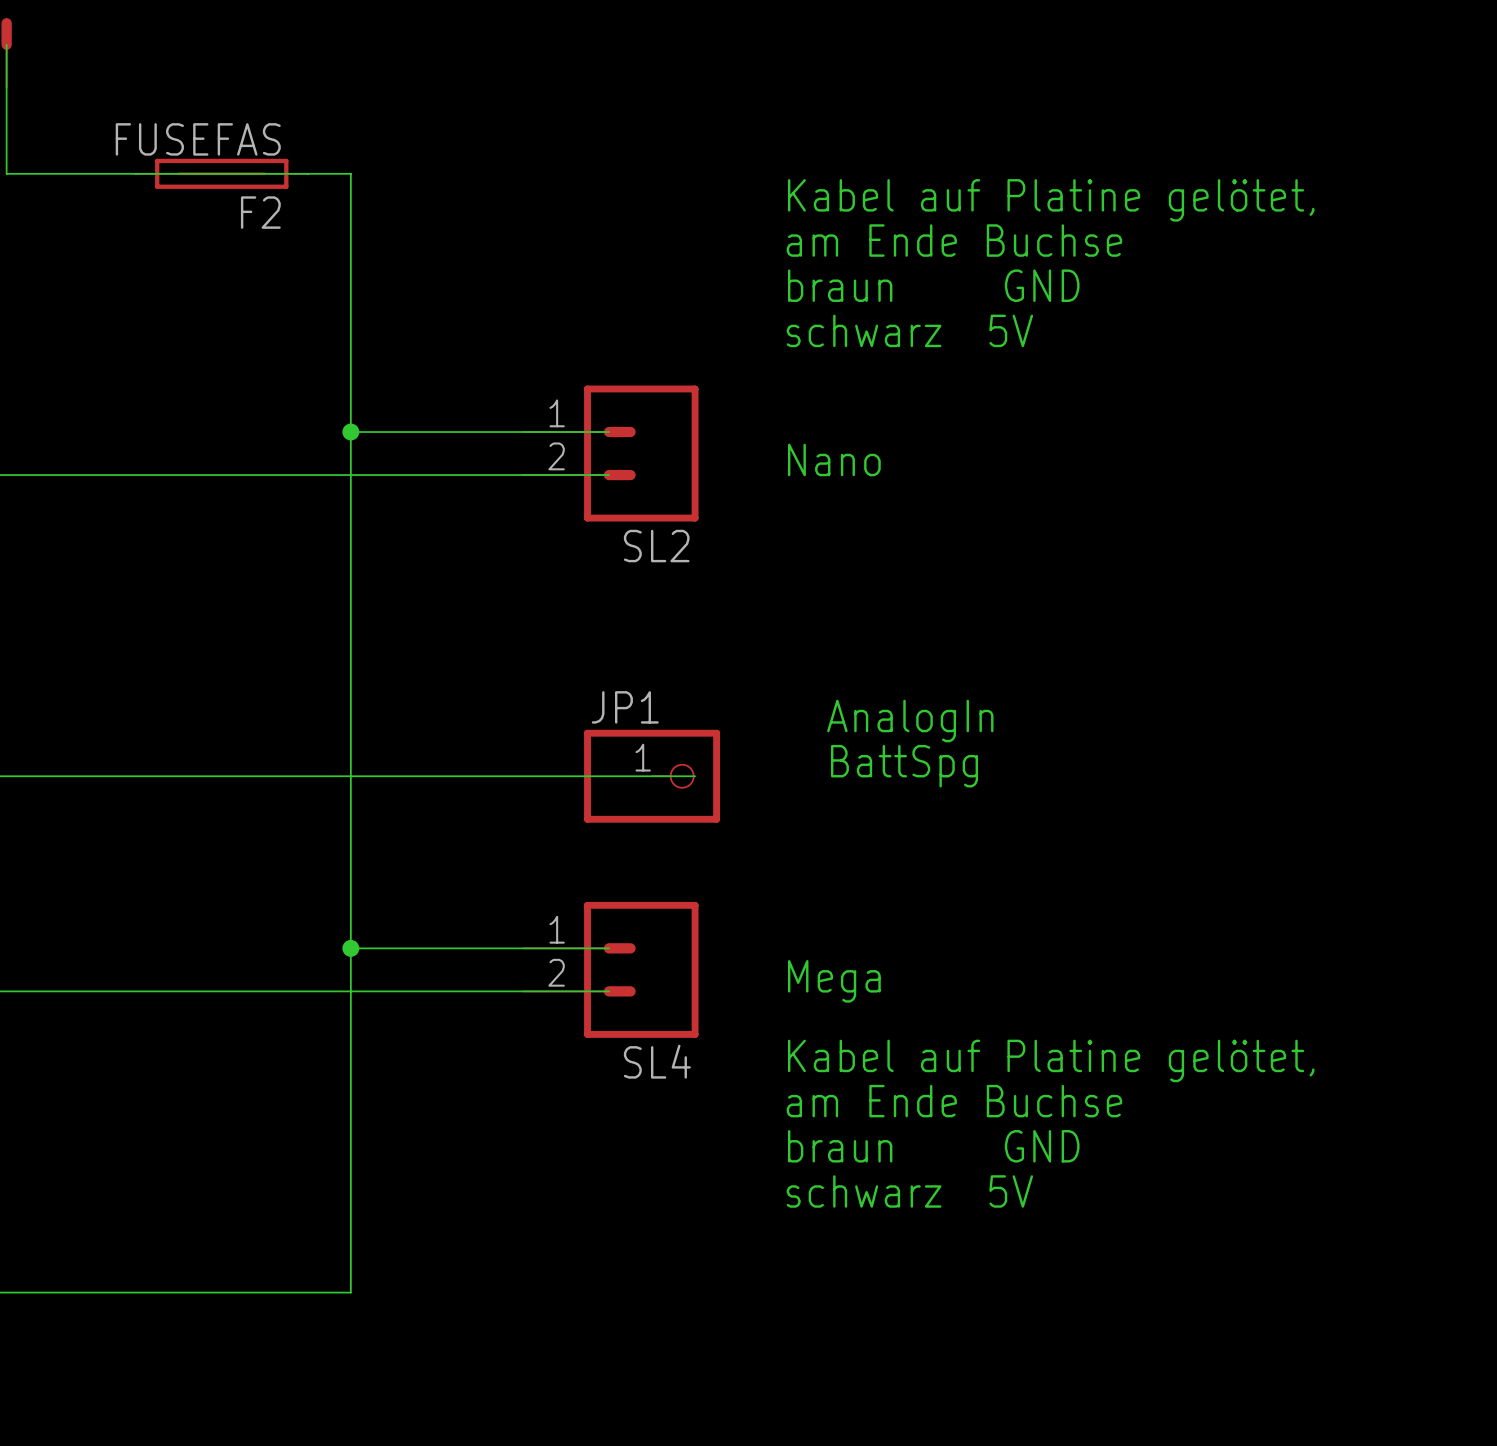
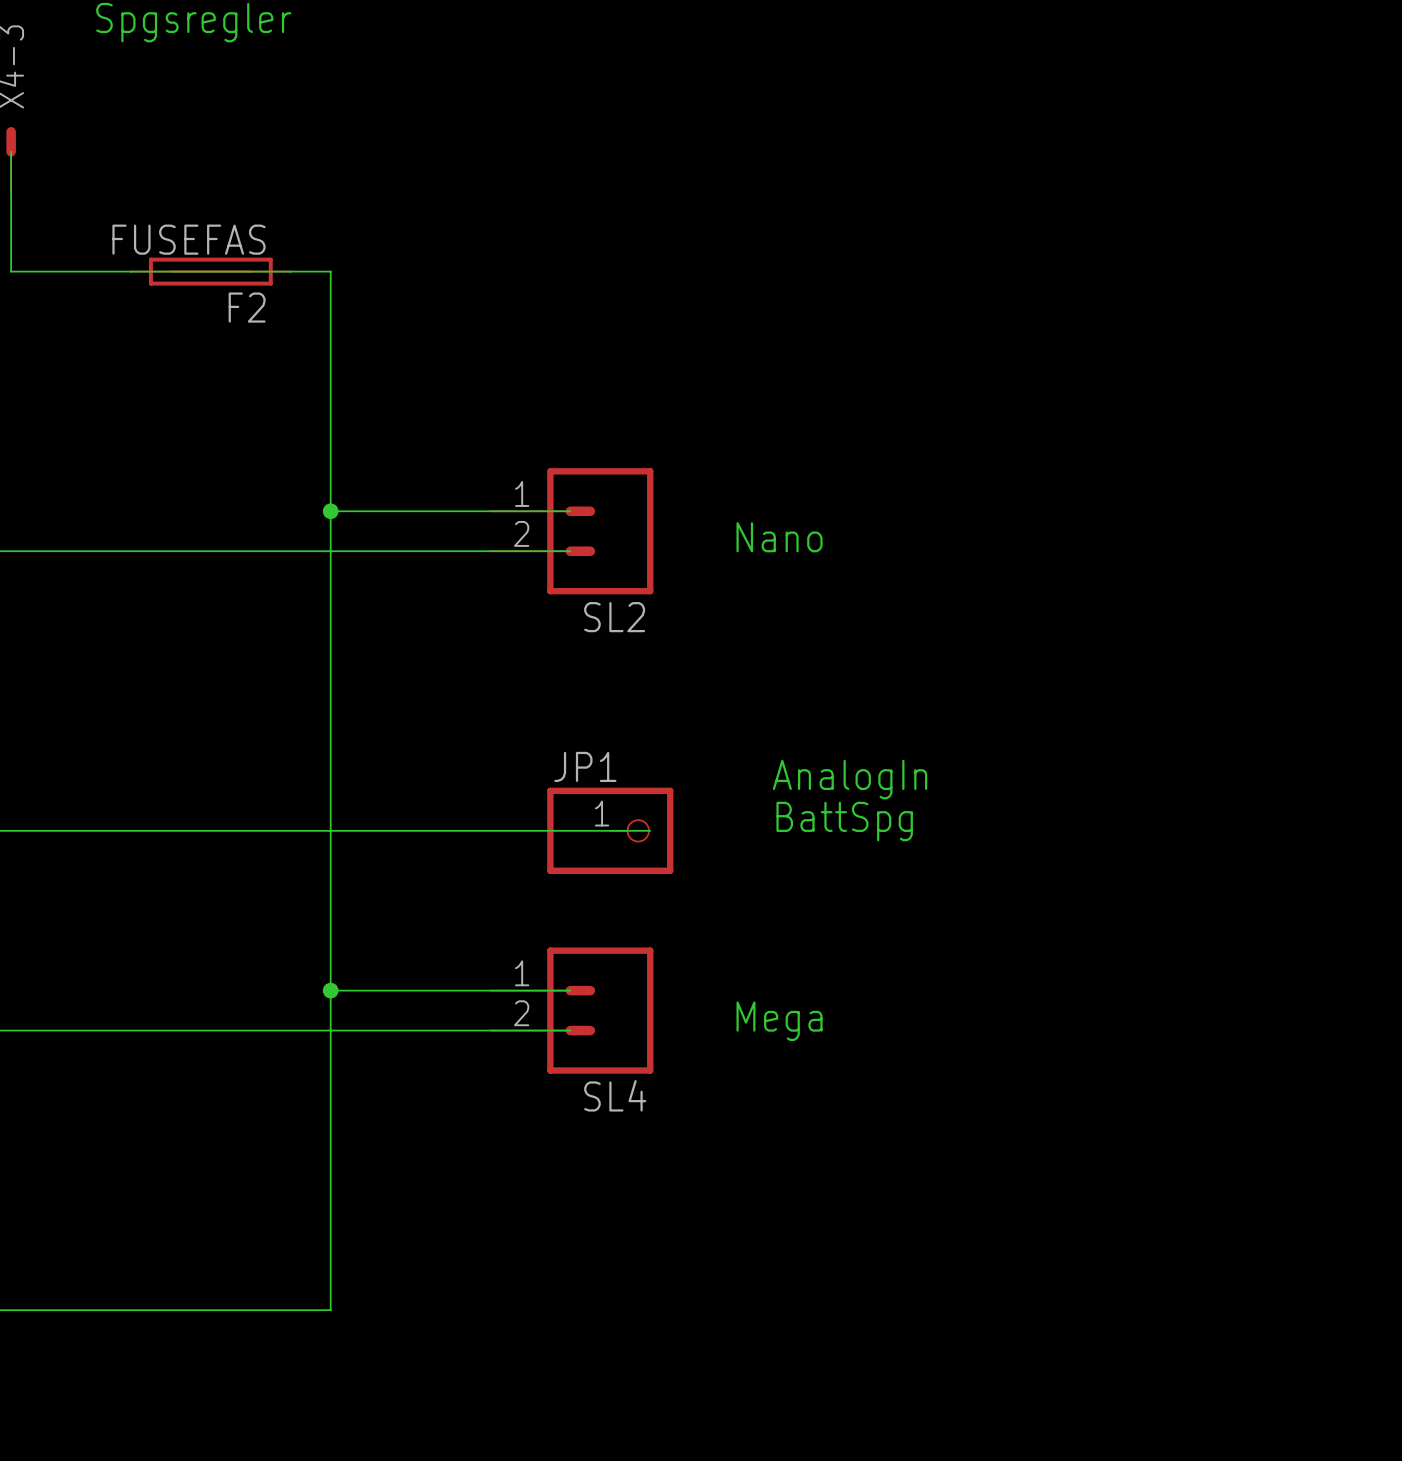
text: Kabel auf Platine gelötet, (1051, 200) -> none
text: am Ende Buchse (954, 240) -> none
text: braun GND (933, 285) -> none
text: schwarz 5V (909, 330) -> none
text: Kabel auf Platine gelötet, (1051, 1060) -> none
text: am Ende Buchse (954, 1101) -> none
text: braun GND (933, 1146) -> none
text: schwarz 5V (909, 1191) -> none

